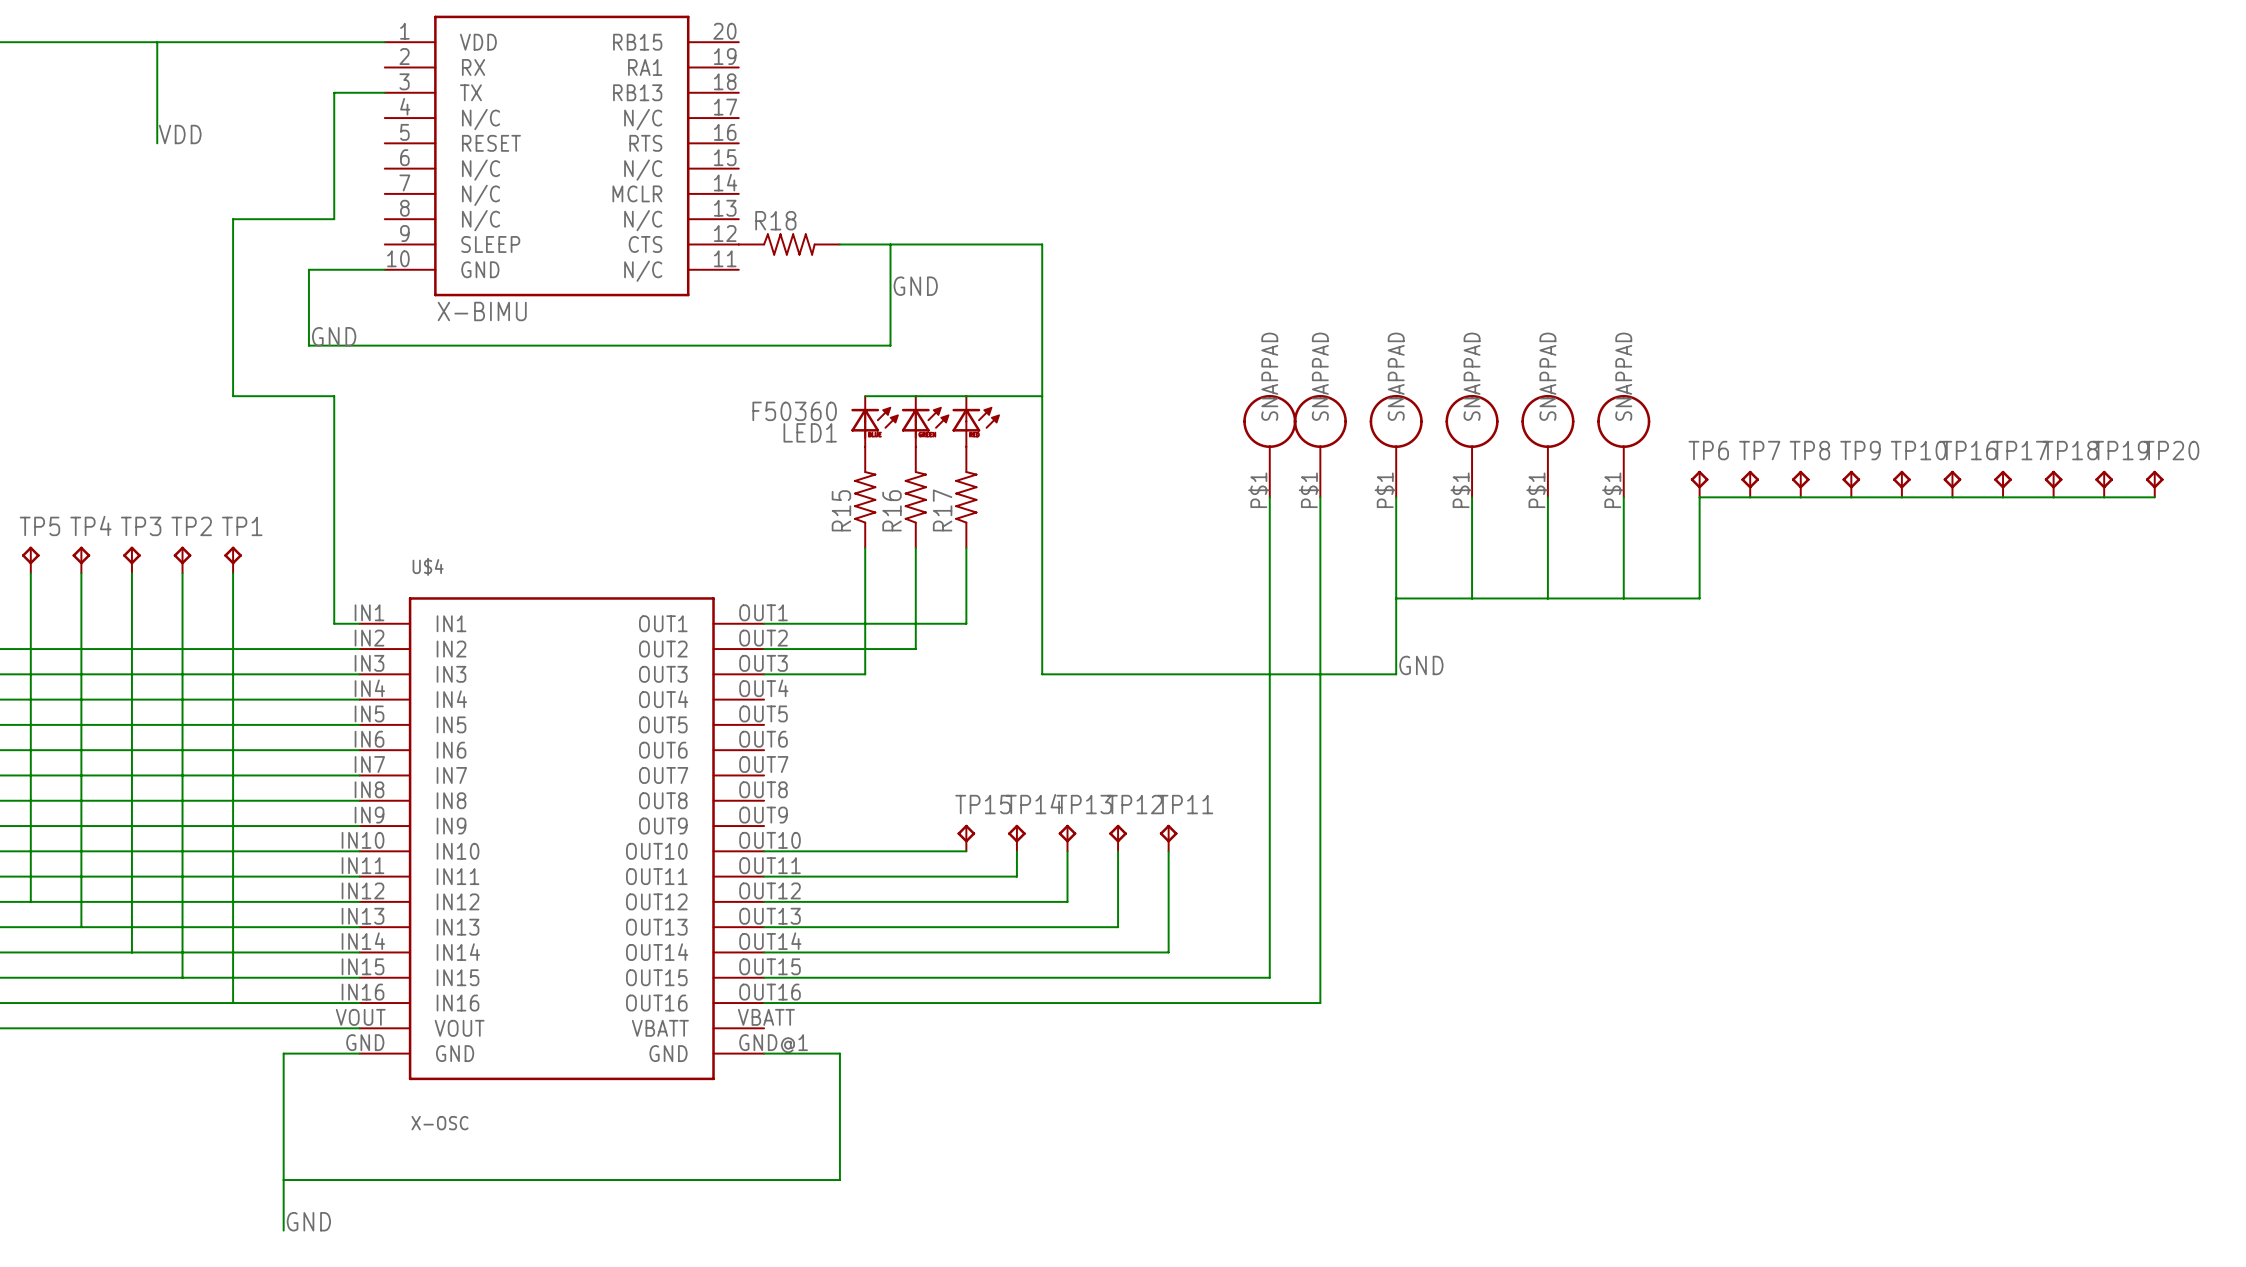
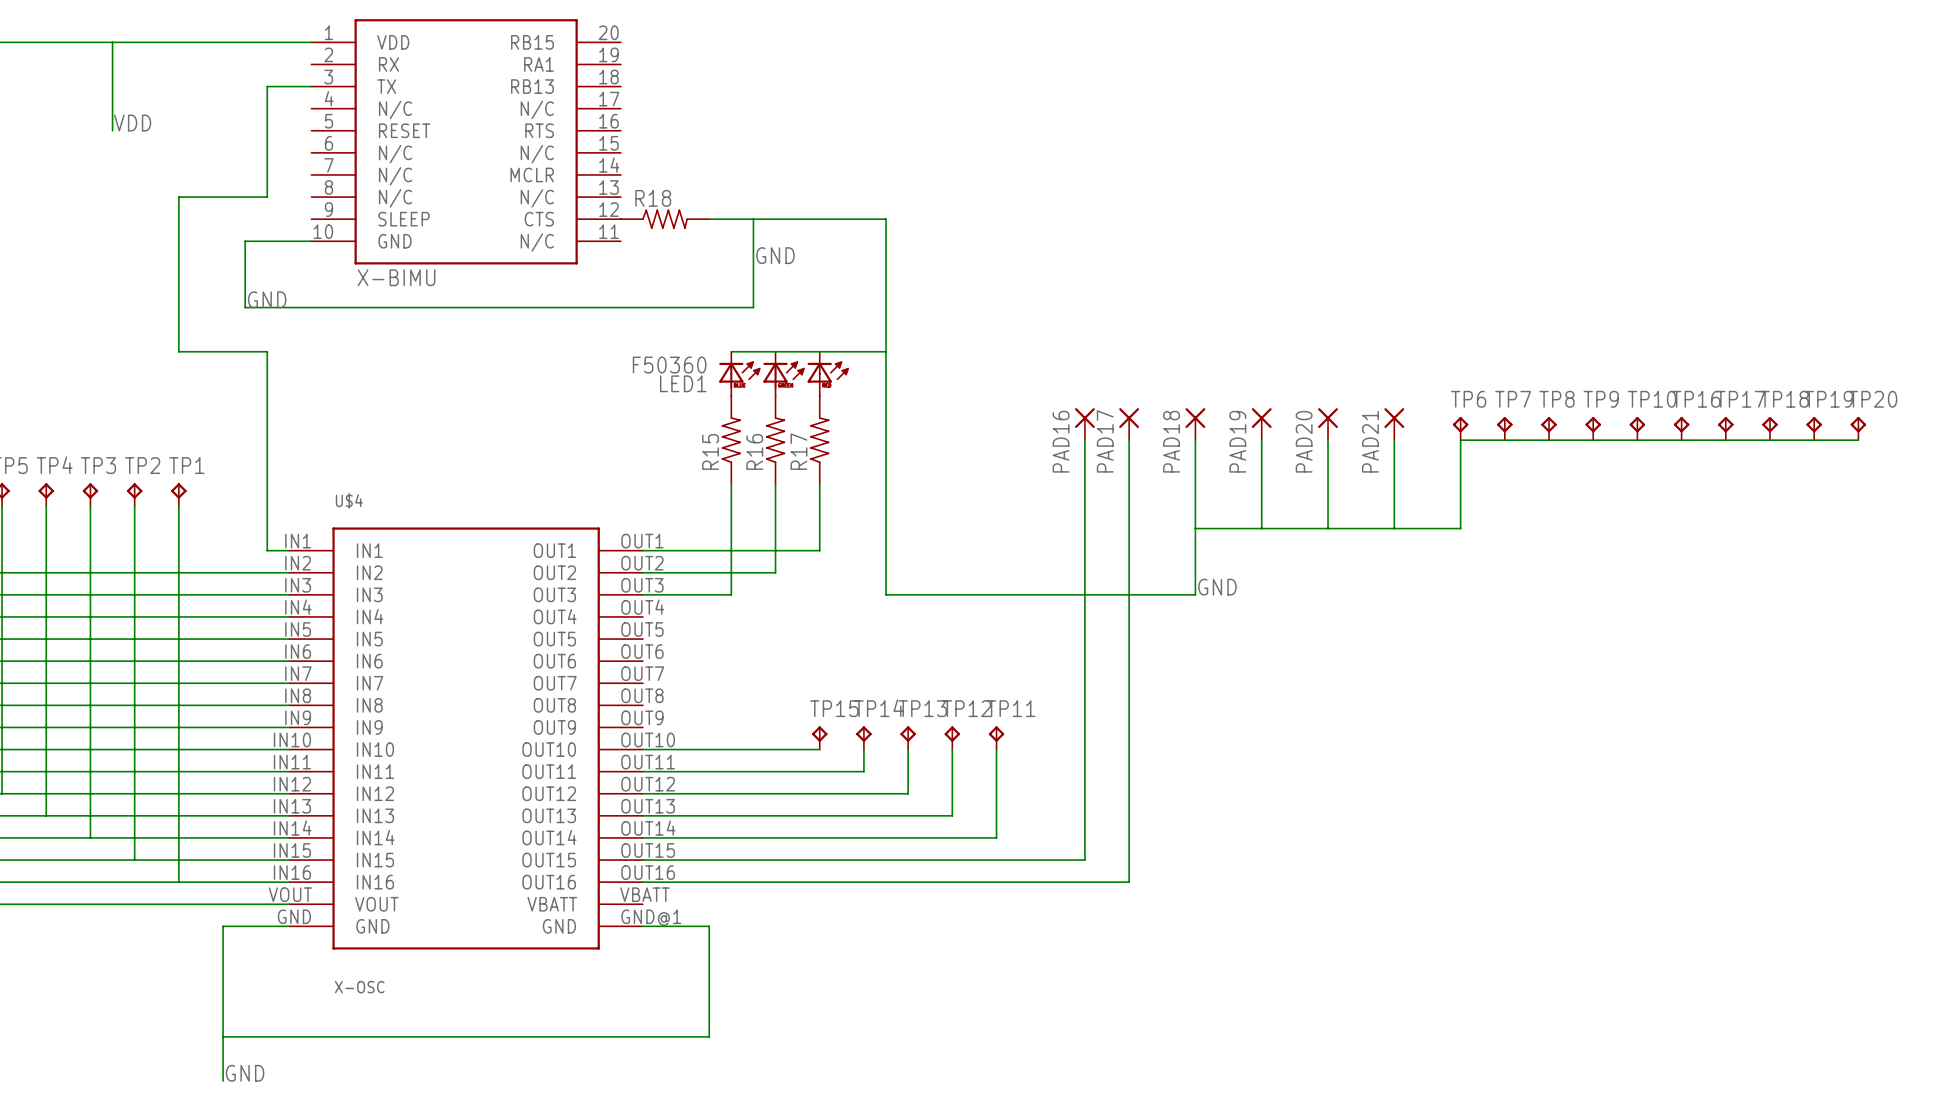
part: (1269, 446) -> none
part: (1320, 446) -> none
part: (1396, 446) -> none
part: (1472, 446) -> none
part: (1547, 446) -> none
part: (1623, 446) -> none
PAD16: none -> (1084, 424)
PAD17: none -> (1129, 424)
PAD18: none -> (1195, 424)
PAD19: none -> (1261, 424)
PAD20: none -> (1328, 424)
PAD21: none -> (1394, 424)

